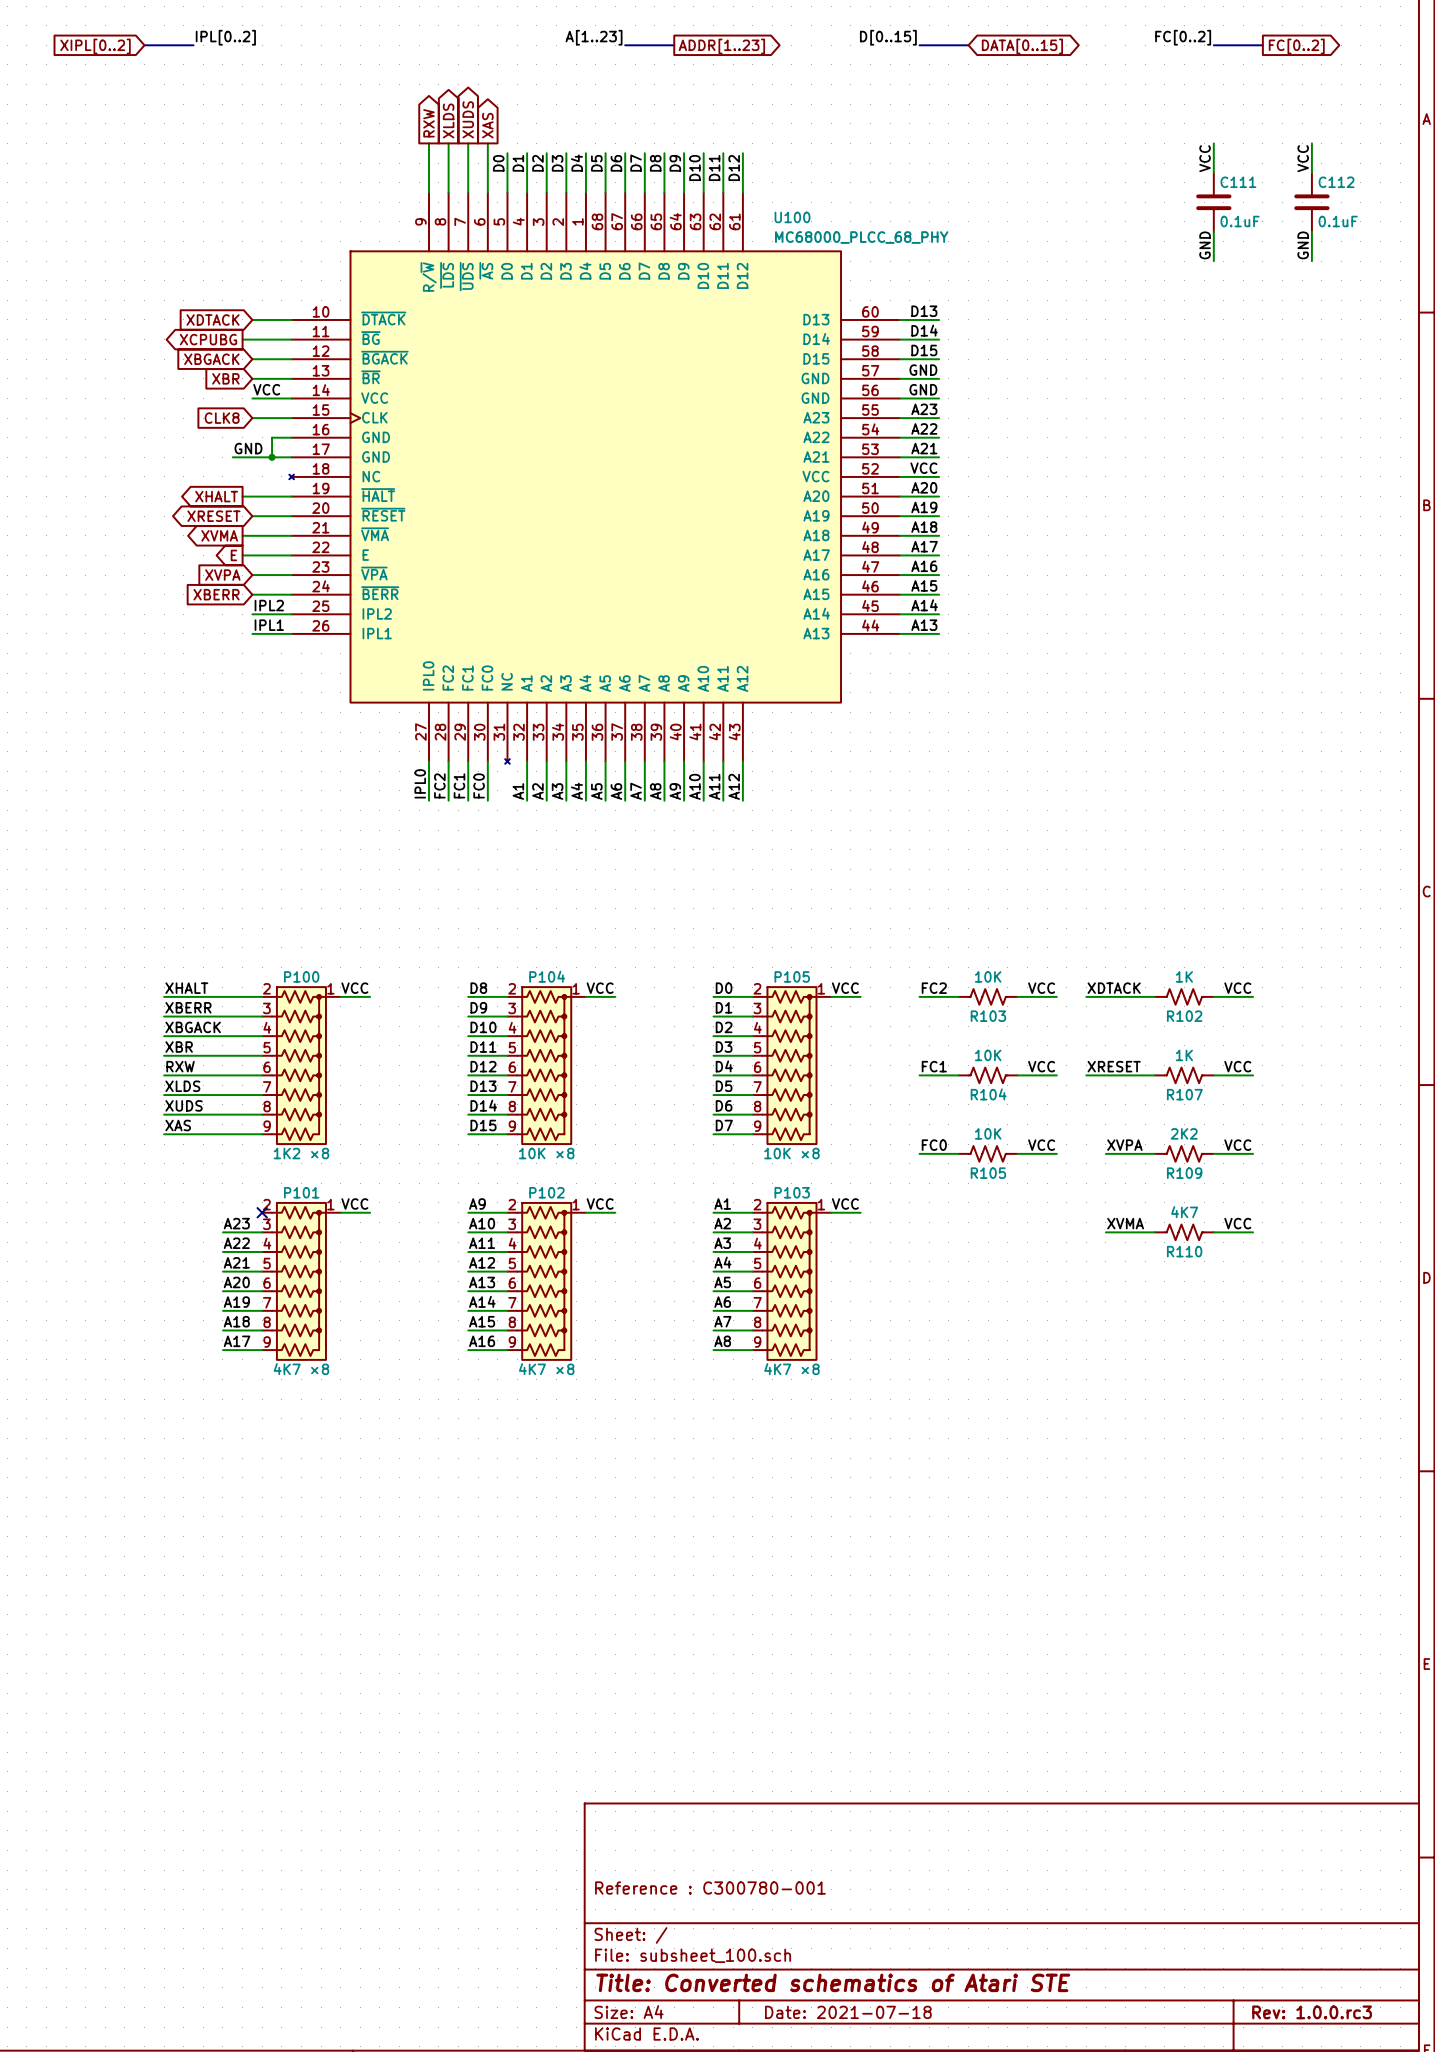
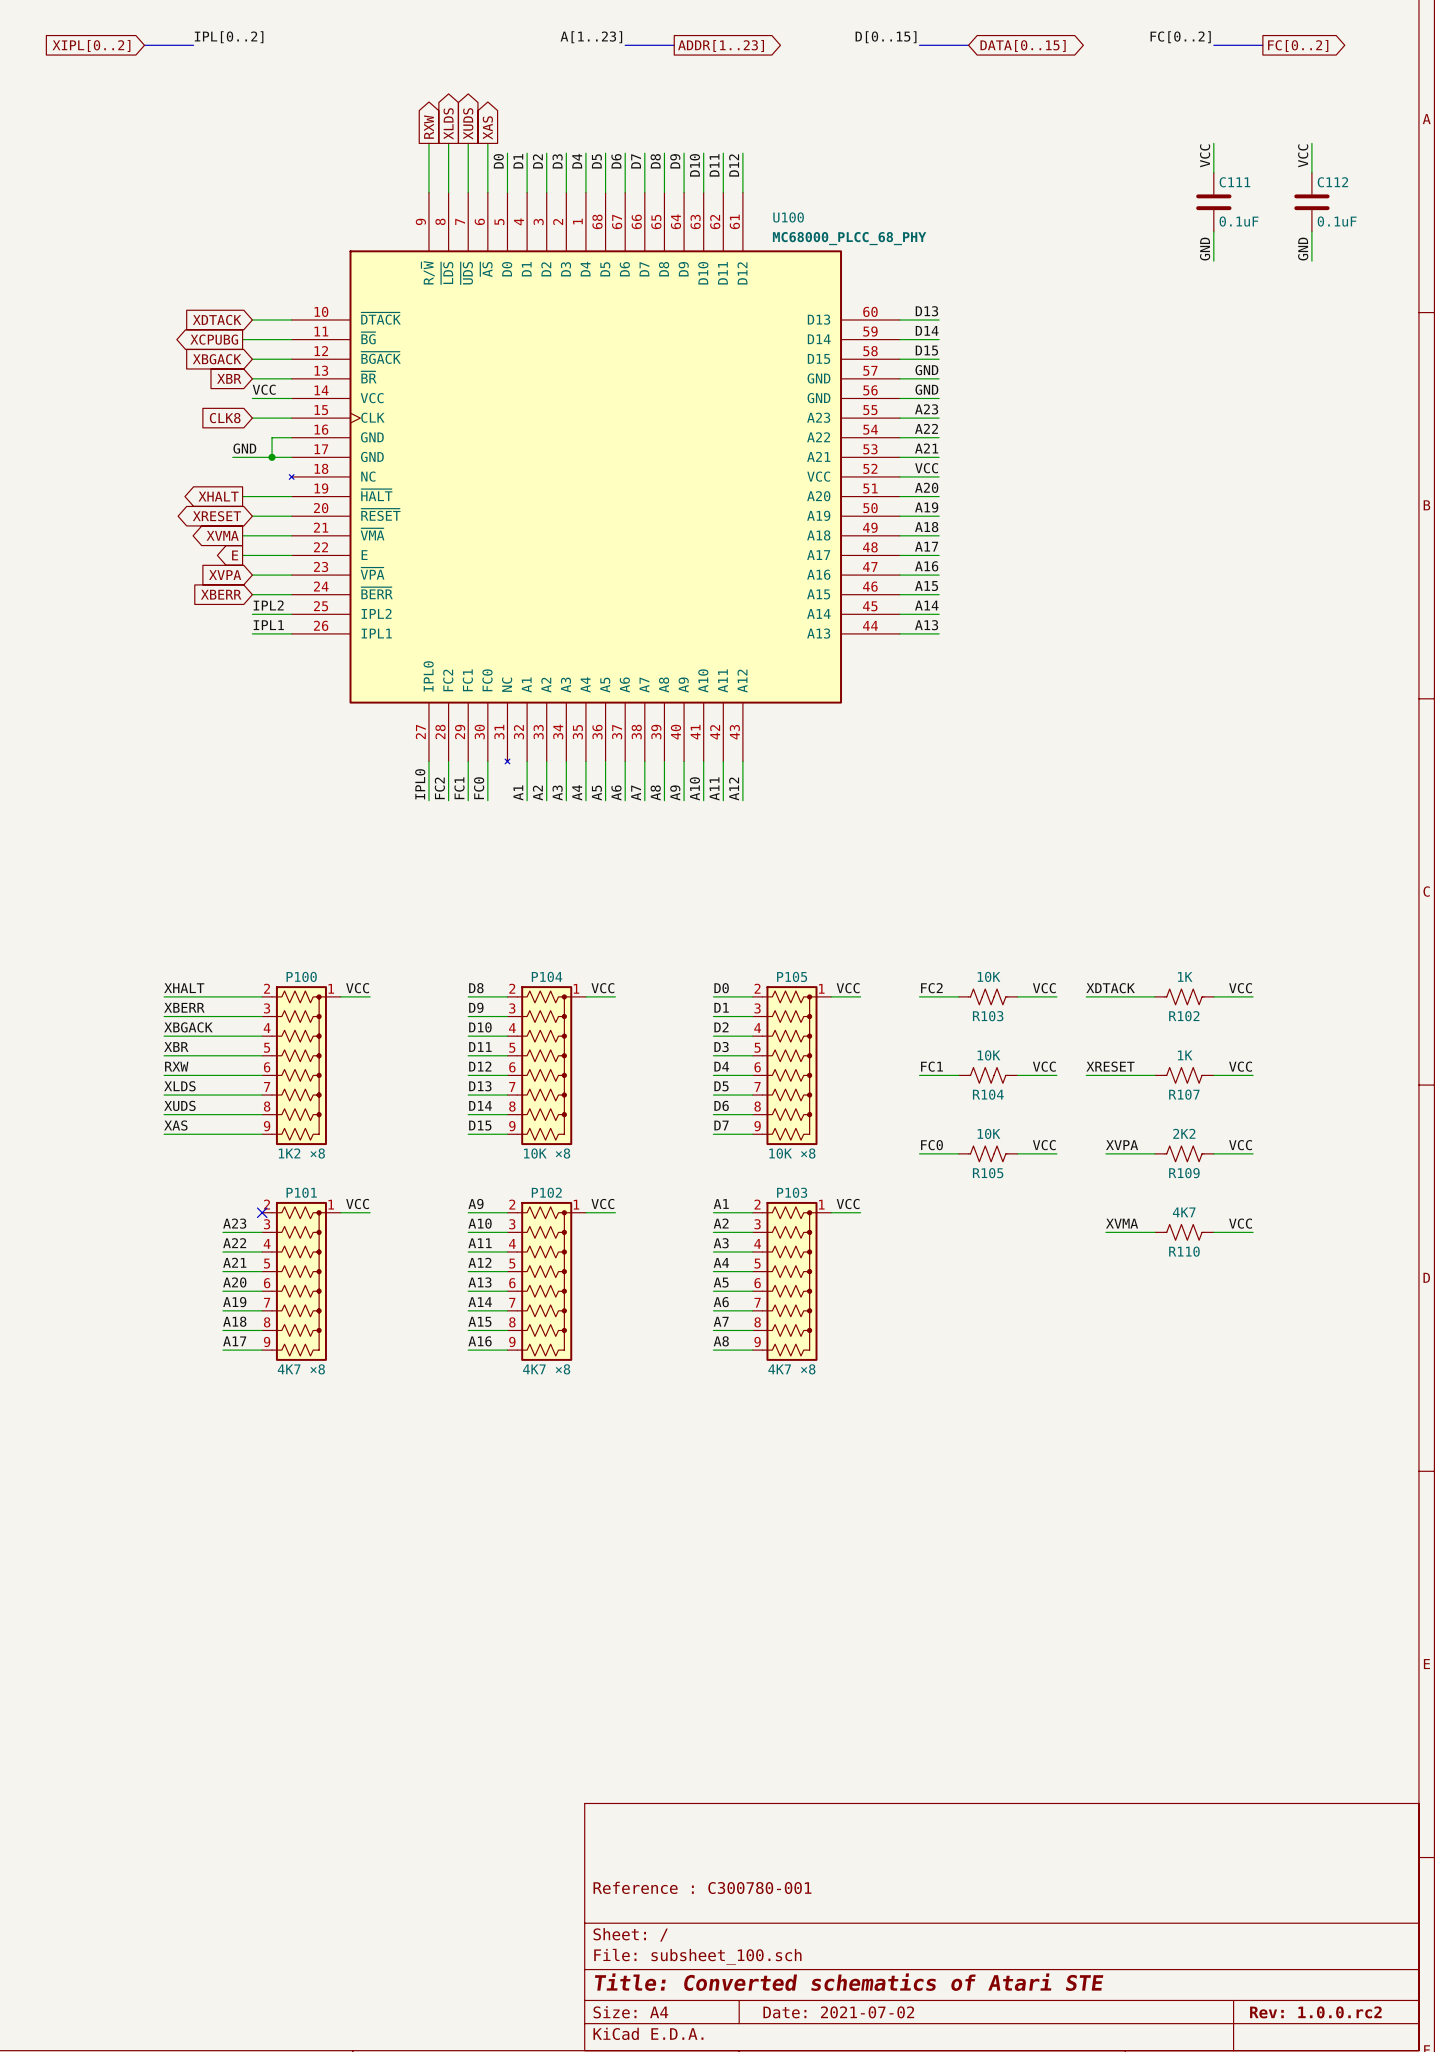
title block: Date: 2021-07-18 (848, 2012) -> Date: 2021-07-02 (838, 2012)
title block: Rev: 1.0.0.rc3 (1312, 2012) -> Rev: 1.0.0.rc2 (1315, 2012)

